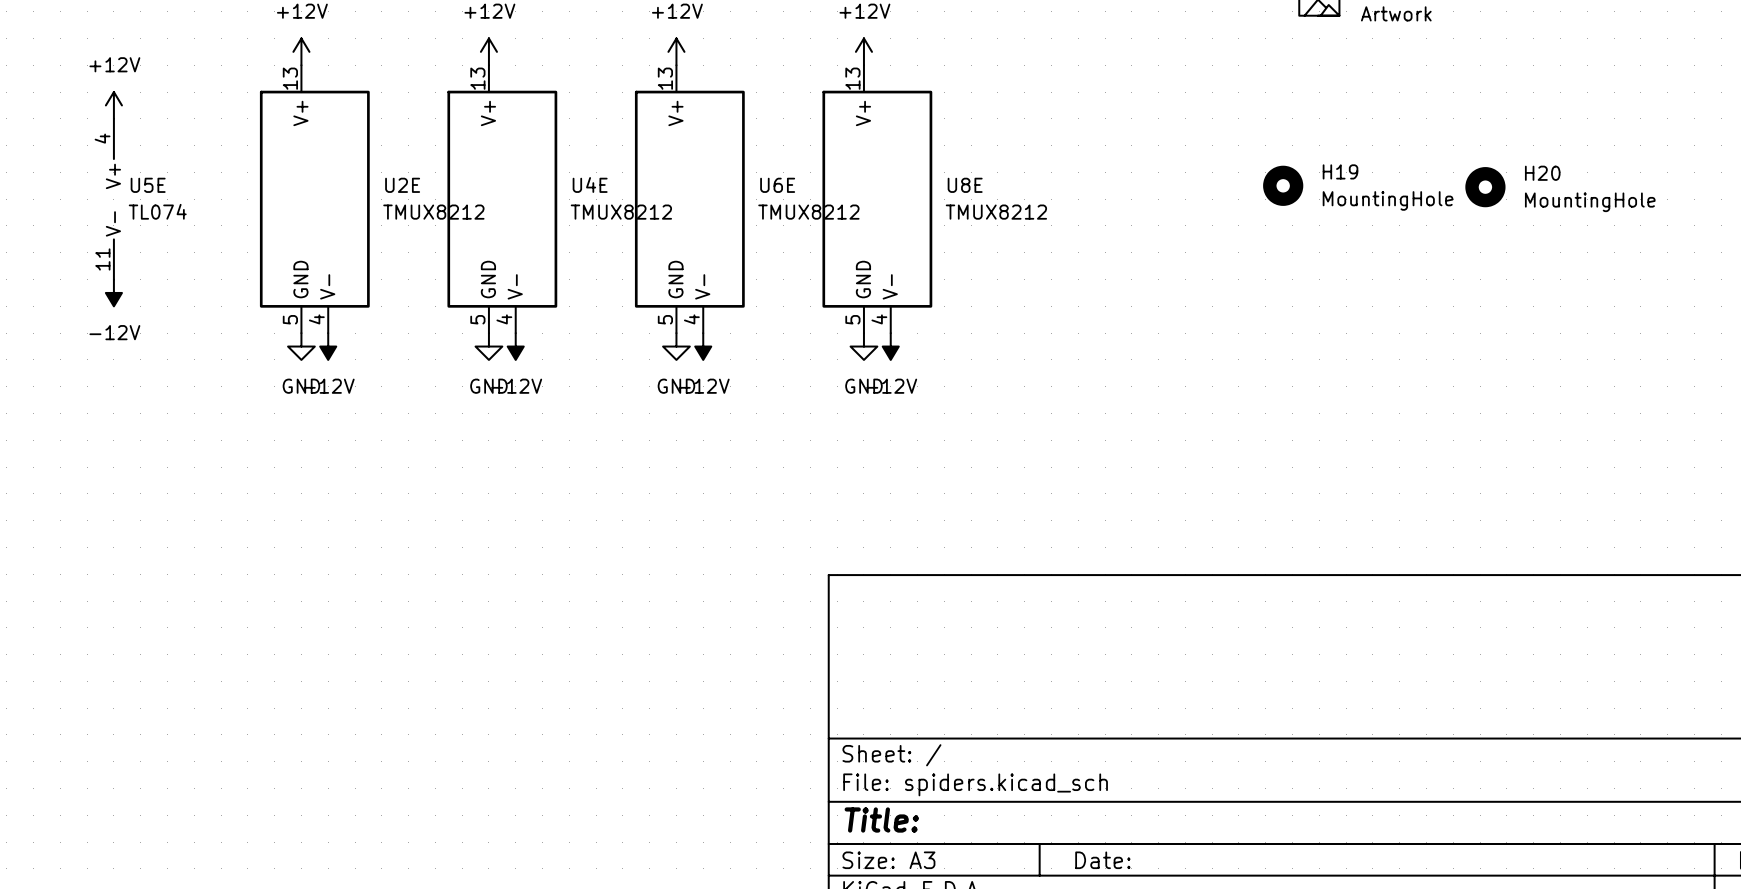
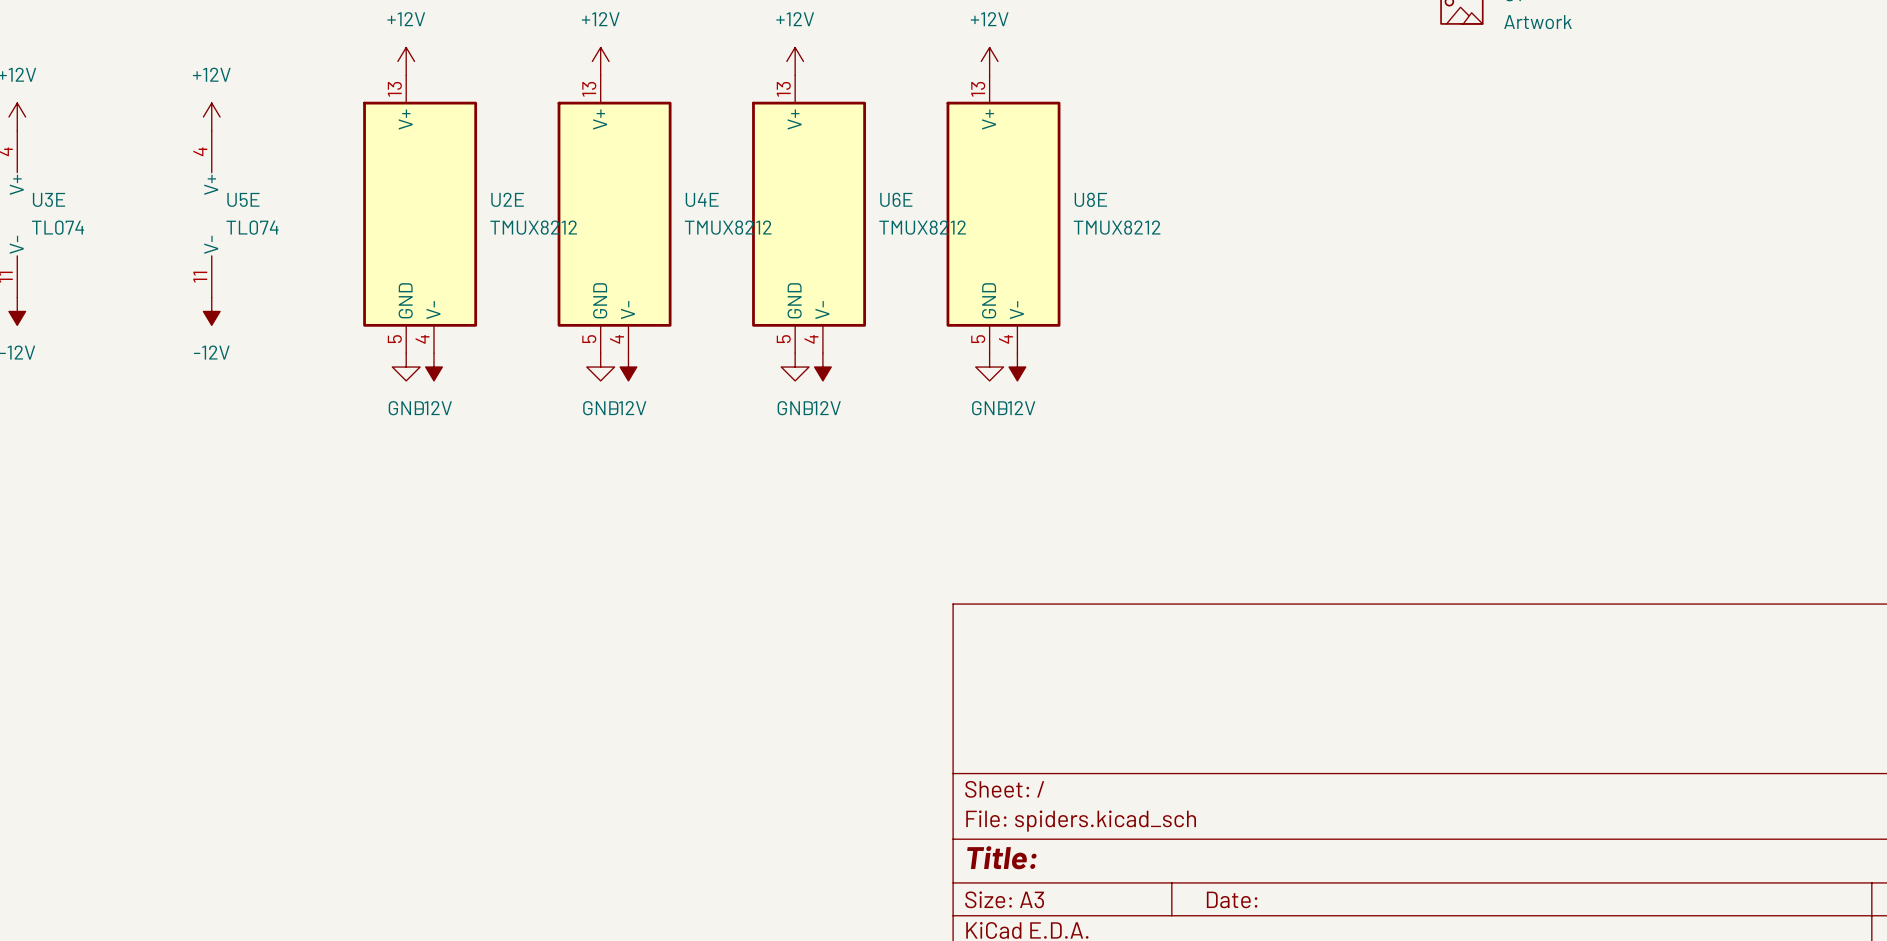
H19: MountingHole (1283, 185) -> none
H20: MountingHole (1485, 187) -> none

